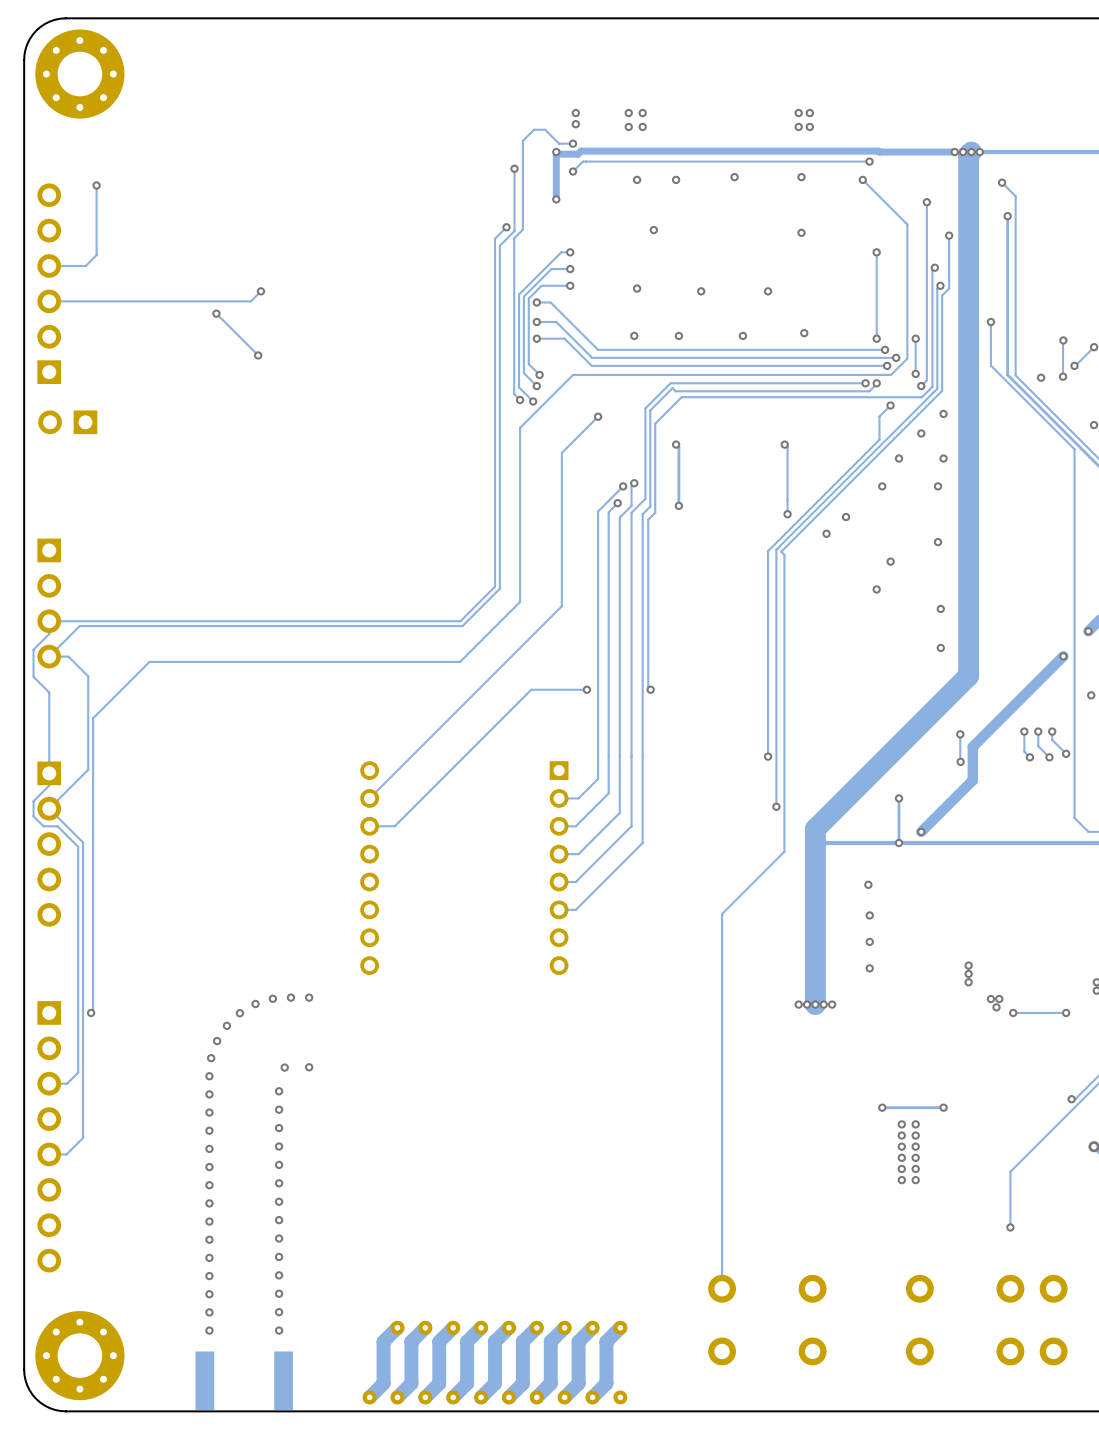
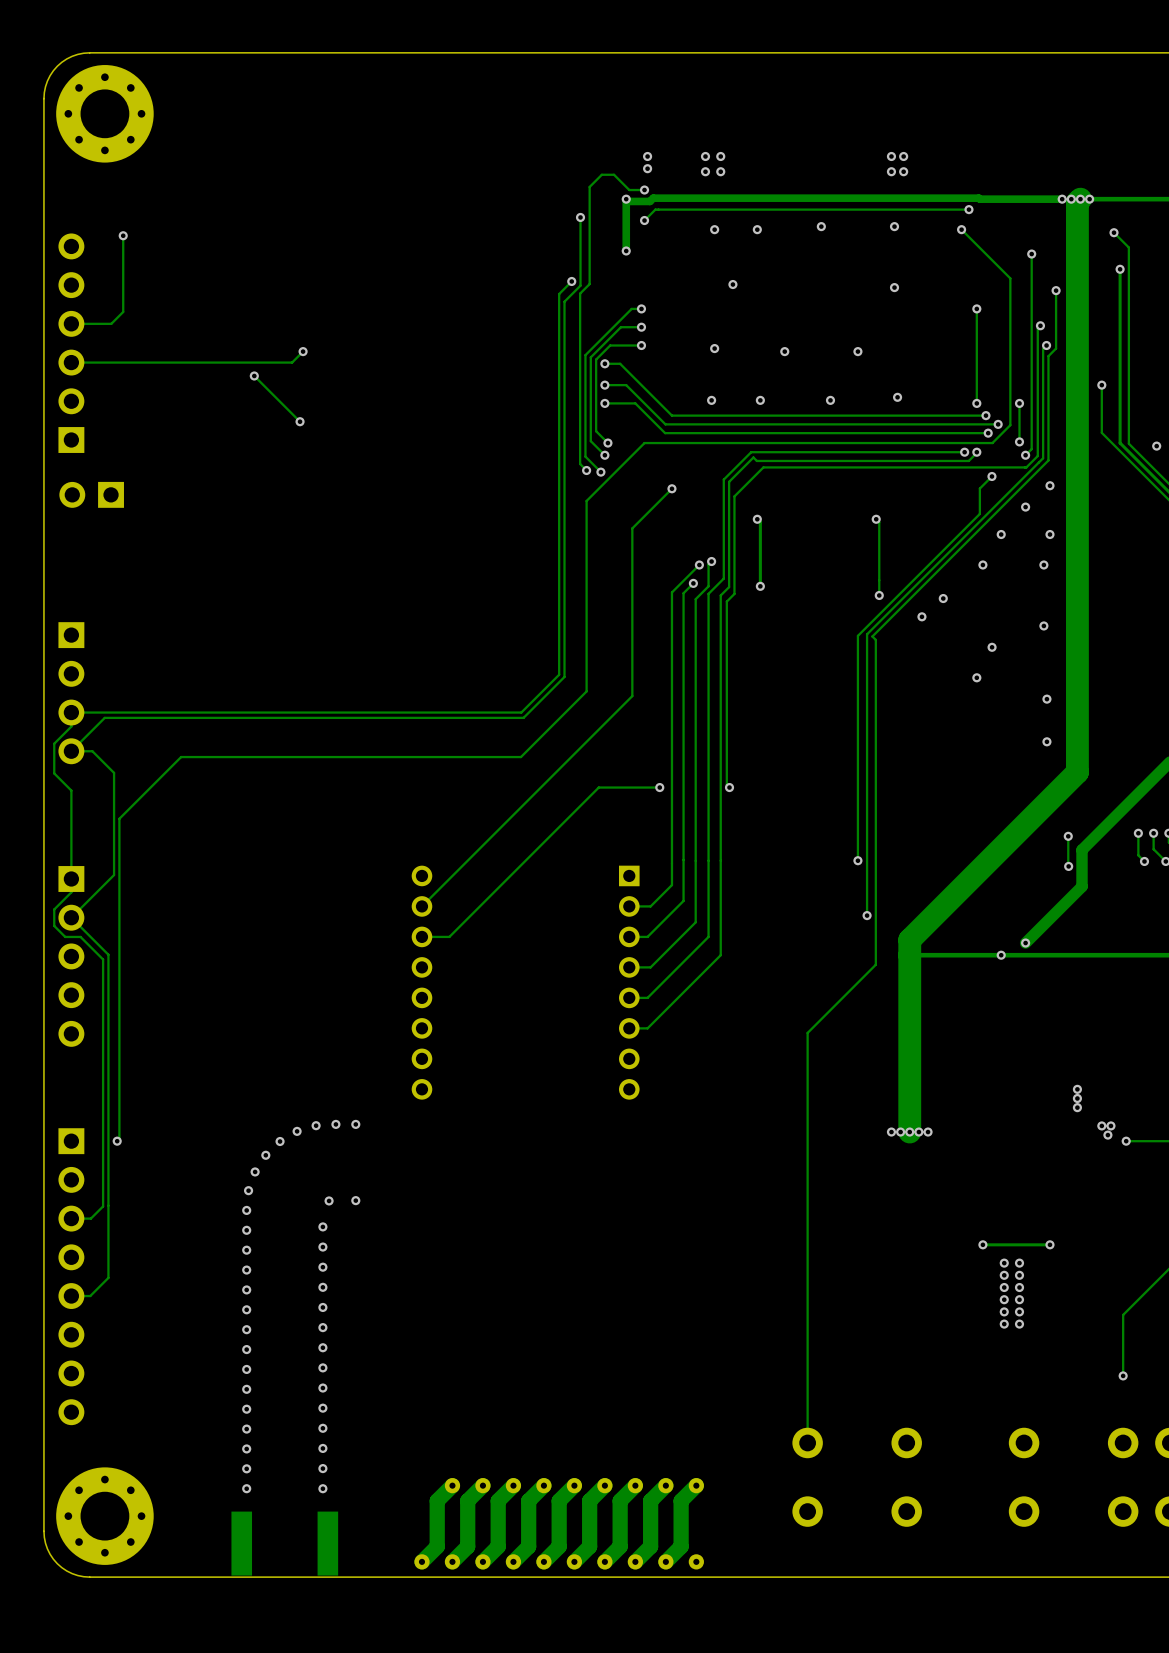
track: (898, 798) (898, 843) -> none
via: (898, 798) -> none
via: (868, 884) -> none
via: (869, 915) -> none
via: (869, 941) -> none
via: (869, 968) -> none

